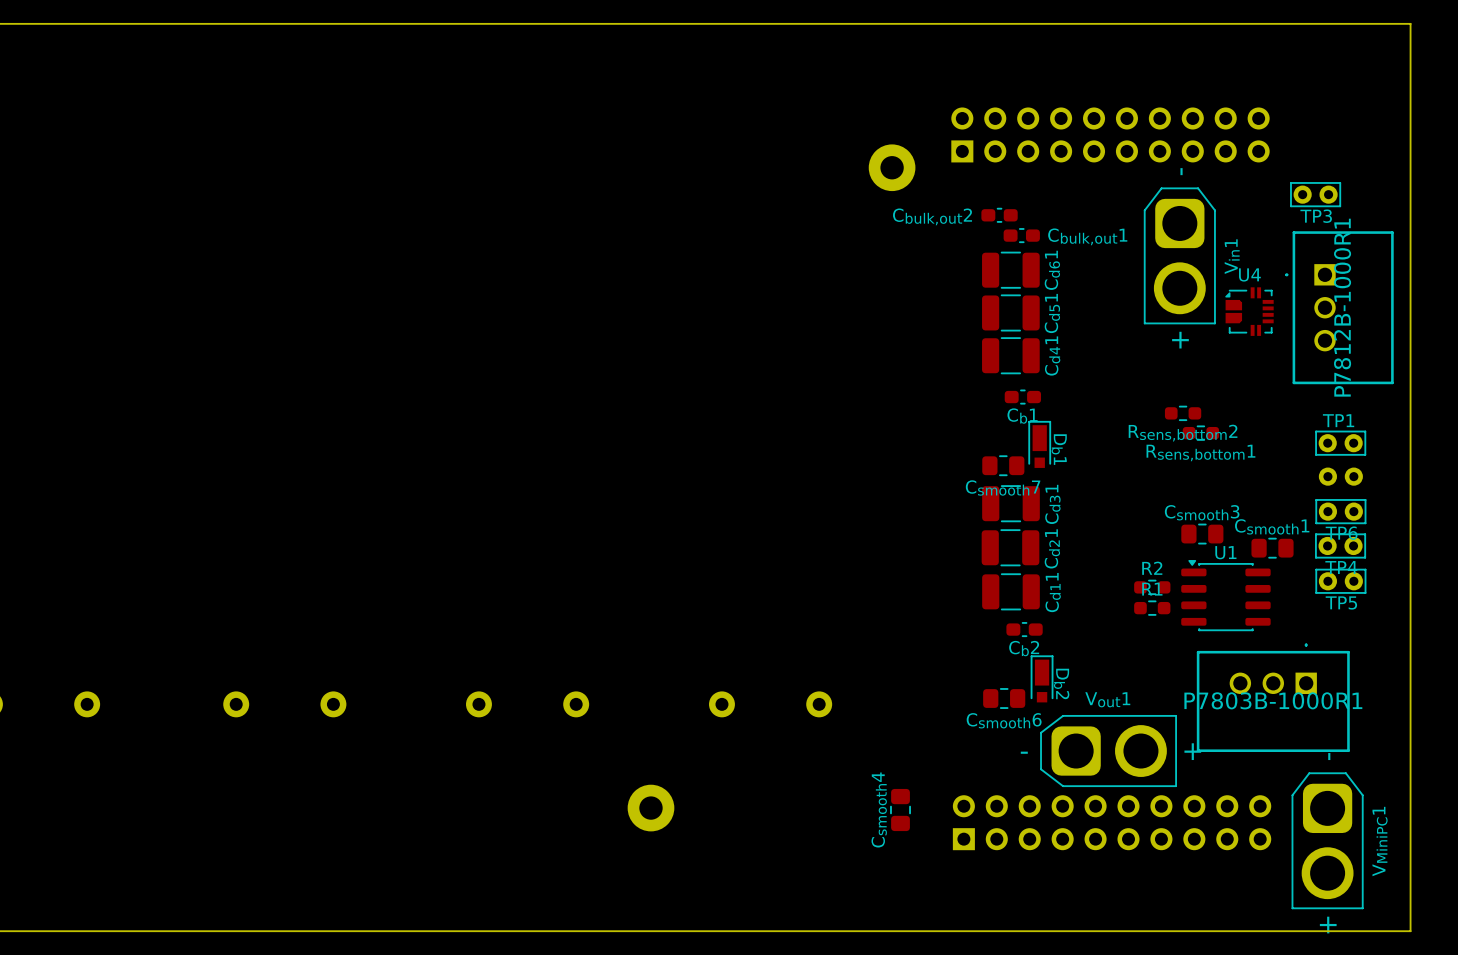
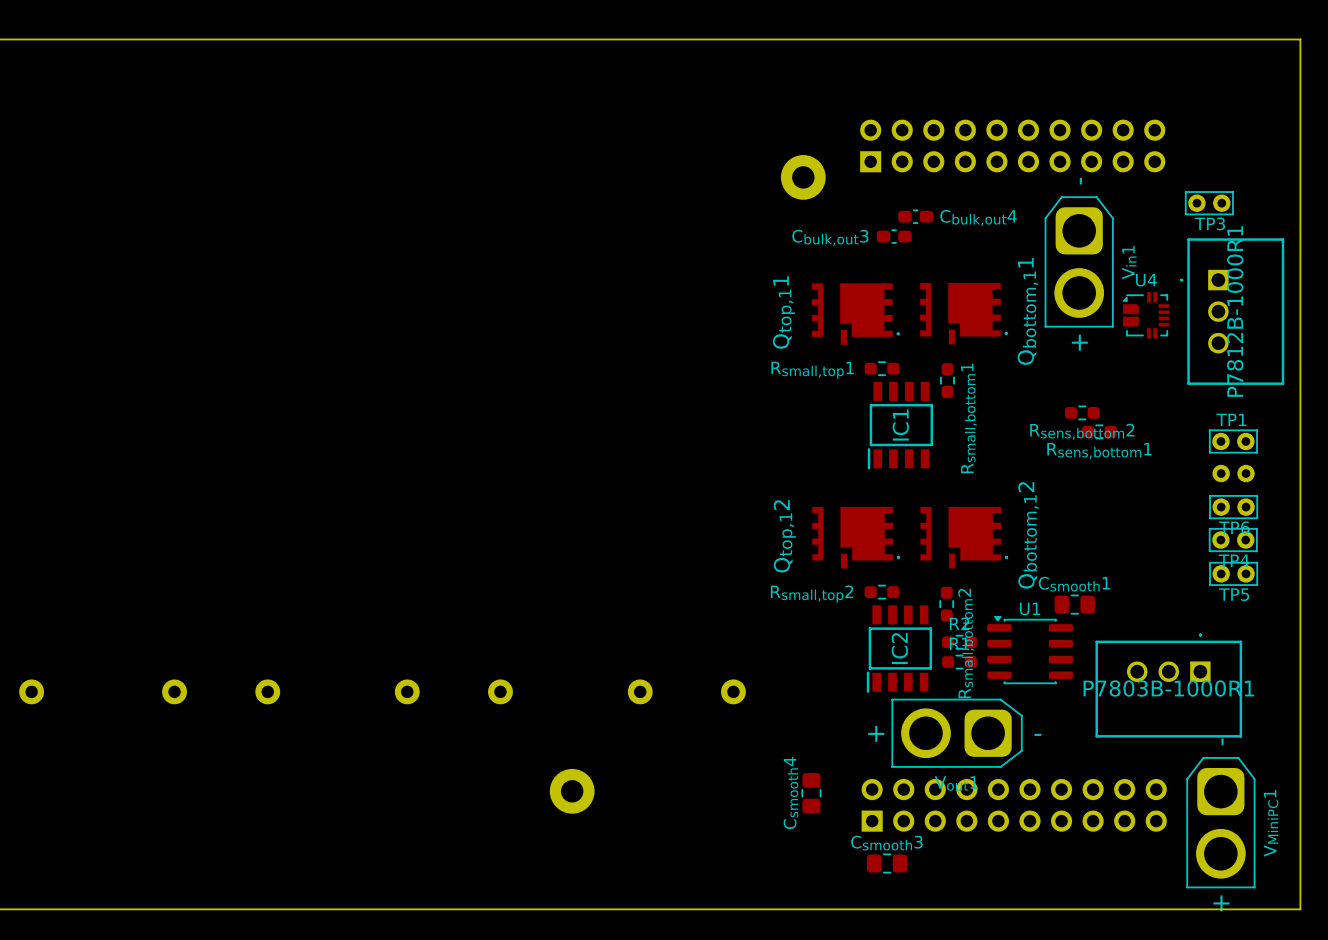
Cbulk,out4: none -> (915, 216)
Cbulk,out2: (999, 215) -> none
Cbulk,out3: none -> (894, 236)
Cbulk,out1: (1021, 235) -> none
Cd61: (1010, 270) -> none
Qbottom,11: none -> (963, 313)
Qtop,11: none -> (855, 314)
Cd51: (1010, 312) -> none
Cd41: (1010, 355) -> none
Rsmall,top1: none -> (881, 368)
Rsmall,bottom1: none -> (947, 380)
Cb1: (1022, 397) -> none
IC1: none -> (900, 425)
Db1: (1039, 444) -> none
Csmooth7: (1003, 465) -> none
Cd31: (1010, 503) -> none
Csmooth3 position: (1202, 534) -> (887, 863)
Qtop,12: none -> (855, 537)
Qbottom,12: none -> (964, 537)
Cd21: (1010, 547) -> none
Csmooth1 position: (1272, 548) -> (1074, 604)
R2 position: (1152, 587) -> (959, 642)
Cd11: (1010, 591) -> none
U1 position: (1225, 595) -> (1030, 650)
Rsmall,top2: none -> (881, 592)
R1 position: (1152, 608) -> (959, 662)
Rsmall,bottom2: none -> (946, 604)
Cb2: (1024, 629) -> none
IC2: none -> (899, 649)
Db2: (1042, 678) -> none
Csmooth6: (1004, 698) -> none
Vout1 rotation: 0° (1108, 751) -> 180° (957, 733)

